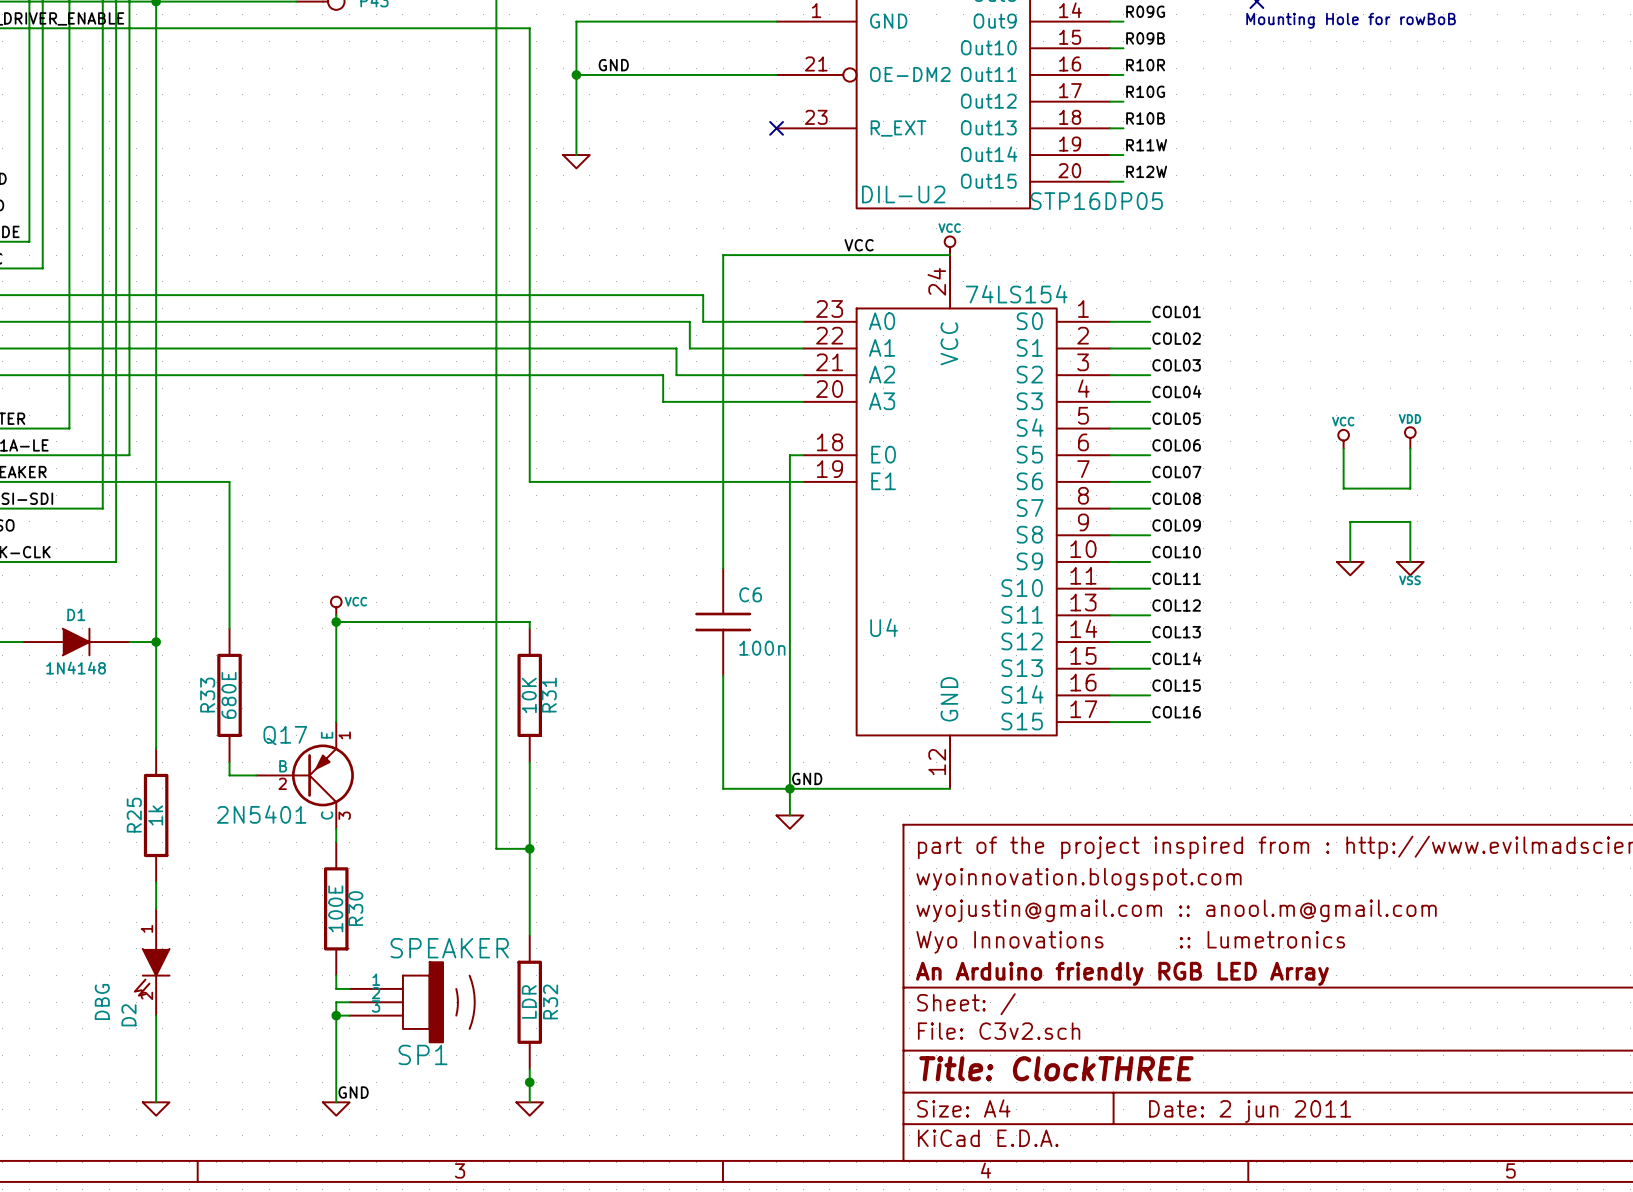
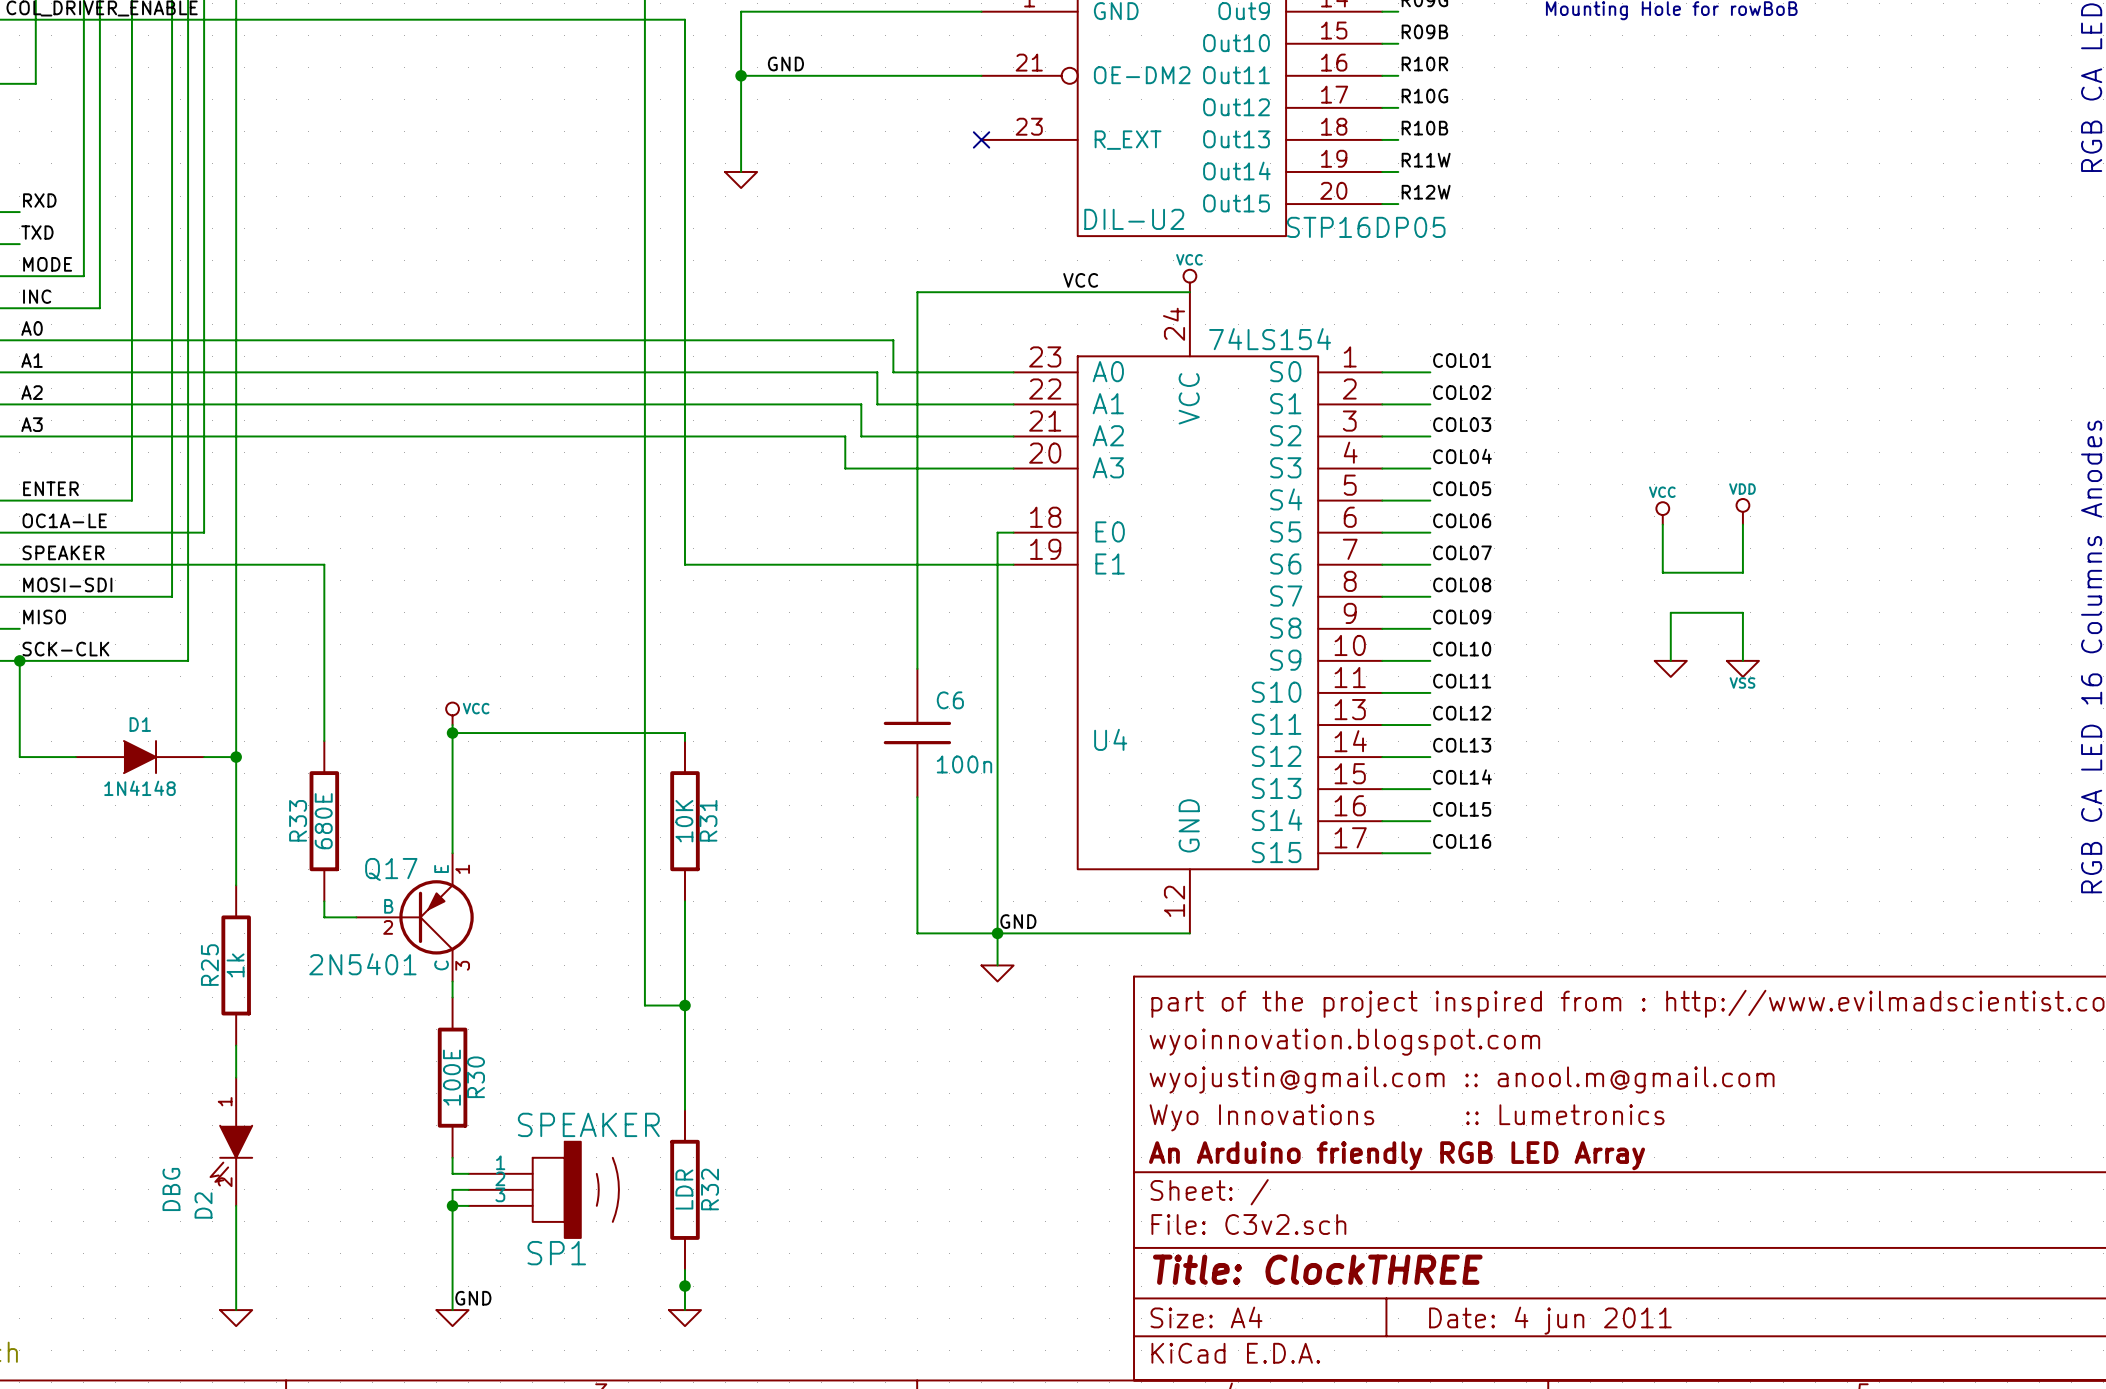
title block: Date: 2 jun 2011 (1250, 1111) -> Date: 4 jun 2011 (1550, 1320)

